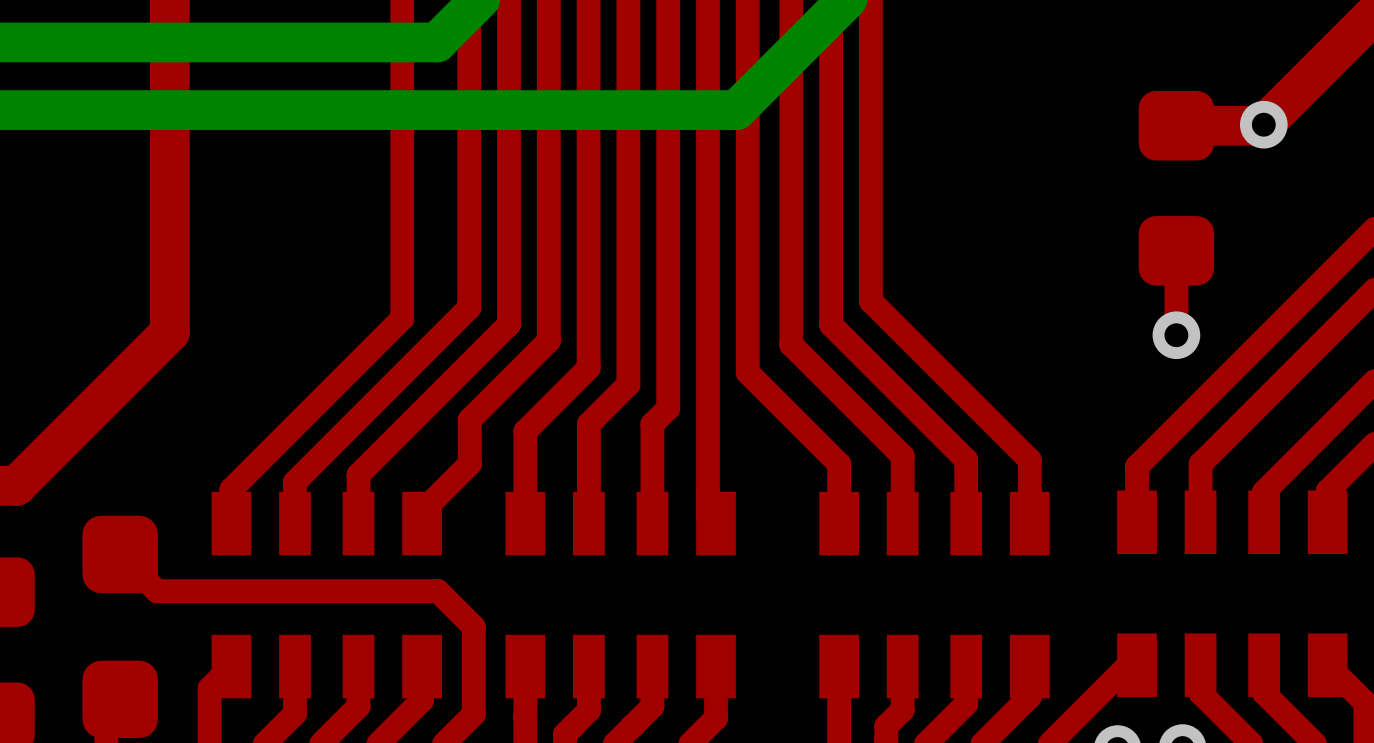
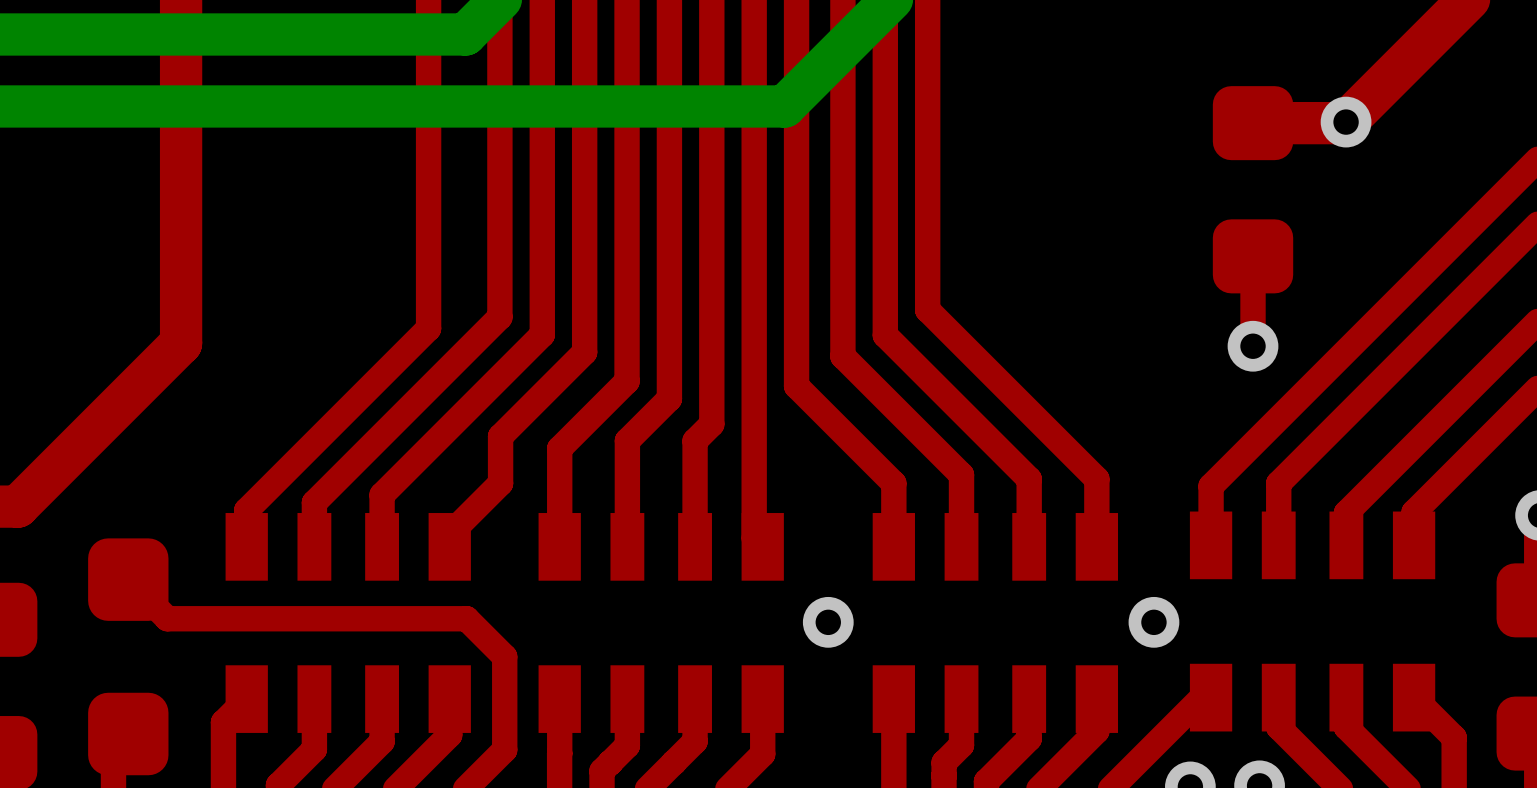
via: none -> (828, 622)
via: none -> (1153, 622)

